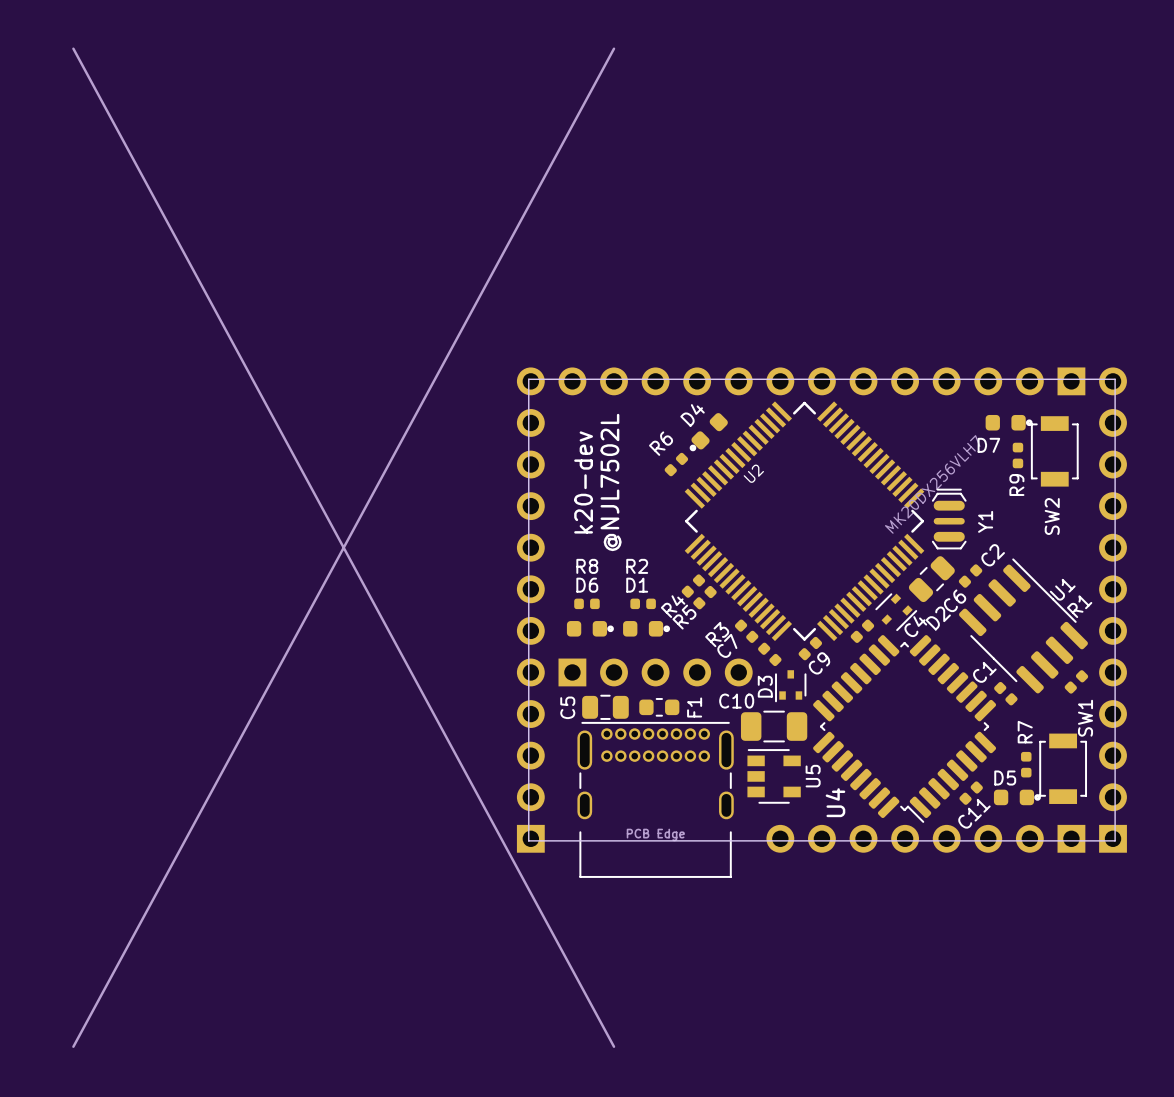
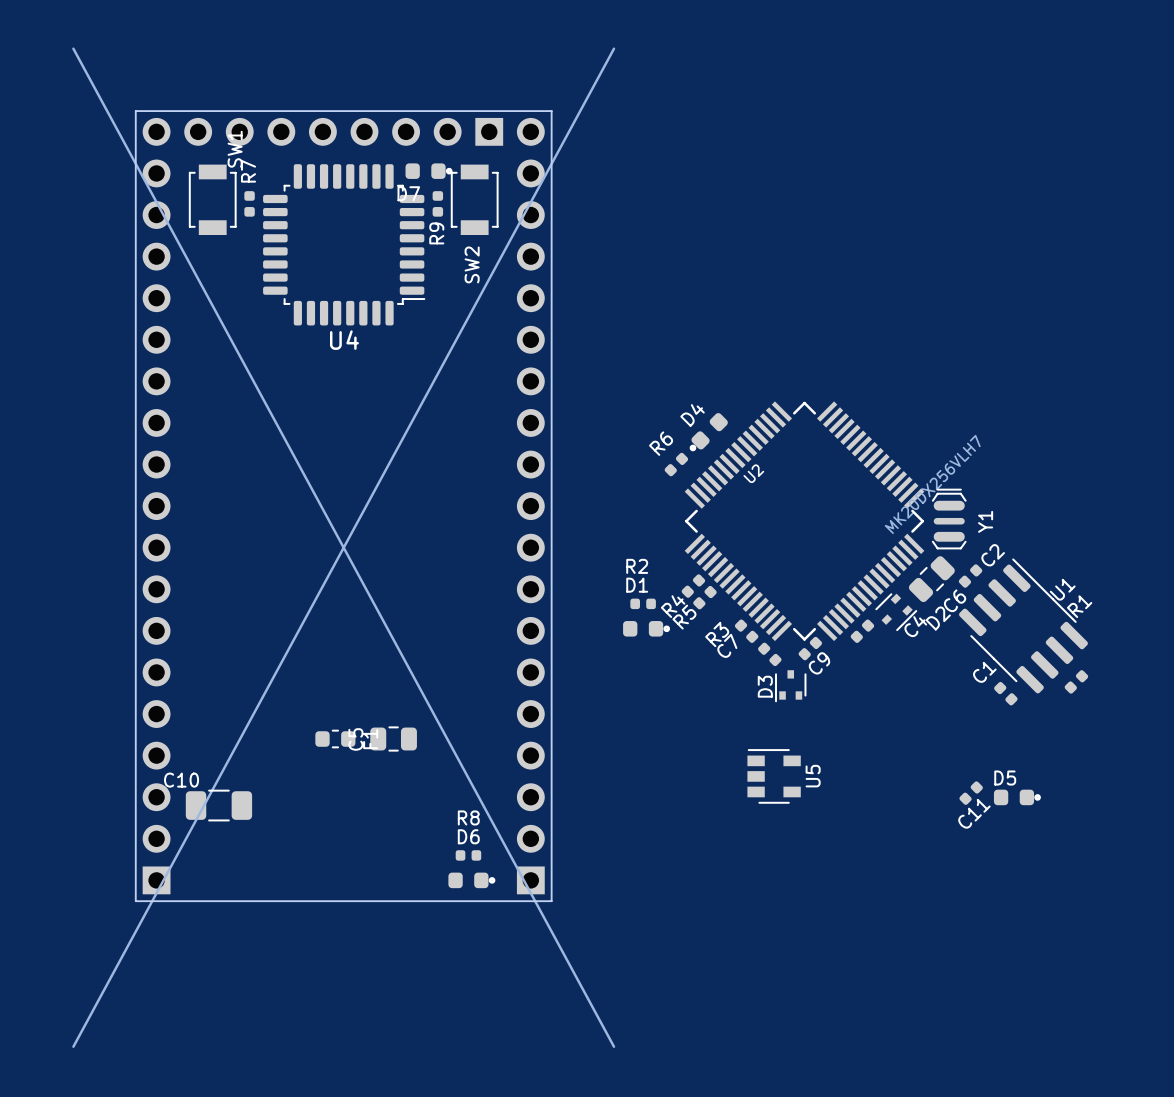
board edge: none -> (135, 111) (551, 111) (551, 901) (135, 901) (135, 111)
part: none -> (343, 131)
board edge: (528, 379) (528, 840) (1115, 840) (1115, 379) (528, 379) -> none
part: (821, 381) -> none
D7 position: (1009, 422) -> (428, 171)
SW2 position: (1054, 451) -> (474, 199)
R9 position: (1017, 455) -> (437, 203)
text: k20-dev (583, 482) -> none
text: @NJL7502L (611, 482) -> none
part: none -> (156, 506)
part: none -> (530, 506)
R8 position: (586, 603) -> (468, 855)
part: (530, 610) -> none
part: (1113, 610) -> none
D6 position: (590, 628) -> (471, 880)
part: (655, 672) -> none
C5 position: (605, 707) -> (393, 739)
F1 position: (659, 707) -> (335, 739)
C10 position: (774, 726) -> (218, 805)
U4 rotation: 0° (904, 728) -> 45° counterclockwise (344, 244)
U4 position: (904, 728) -> (344, 244)
R7 position: (1026, 764) -> (249, 203)
SW1 position: (1063, 768) -> (212, 199)
part: (655, 799) -> none
part: (925, 838) -> none

